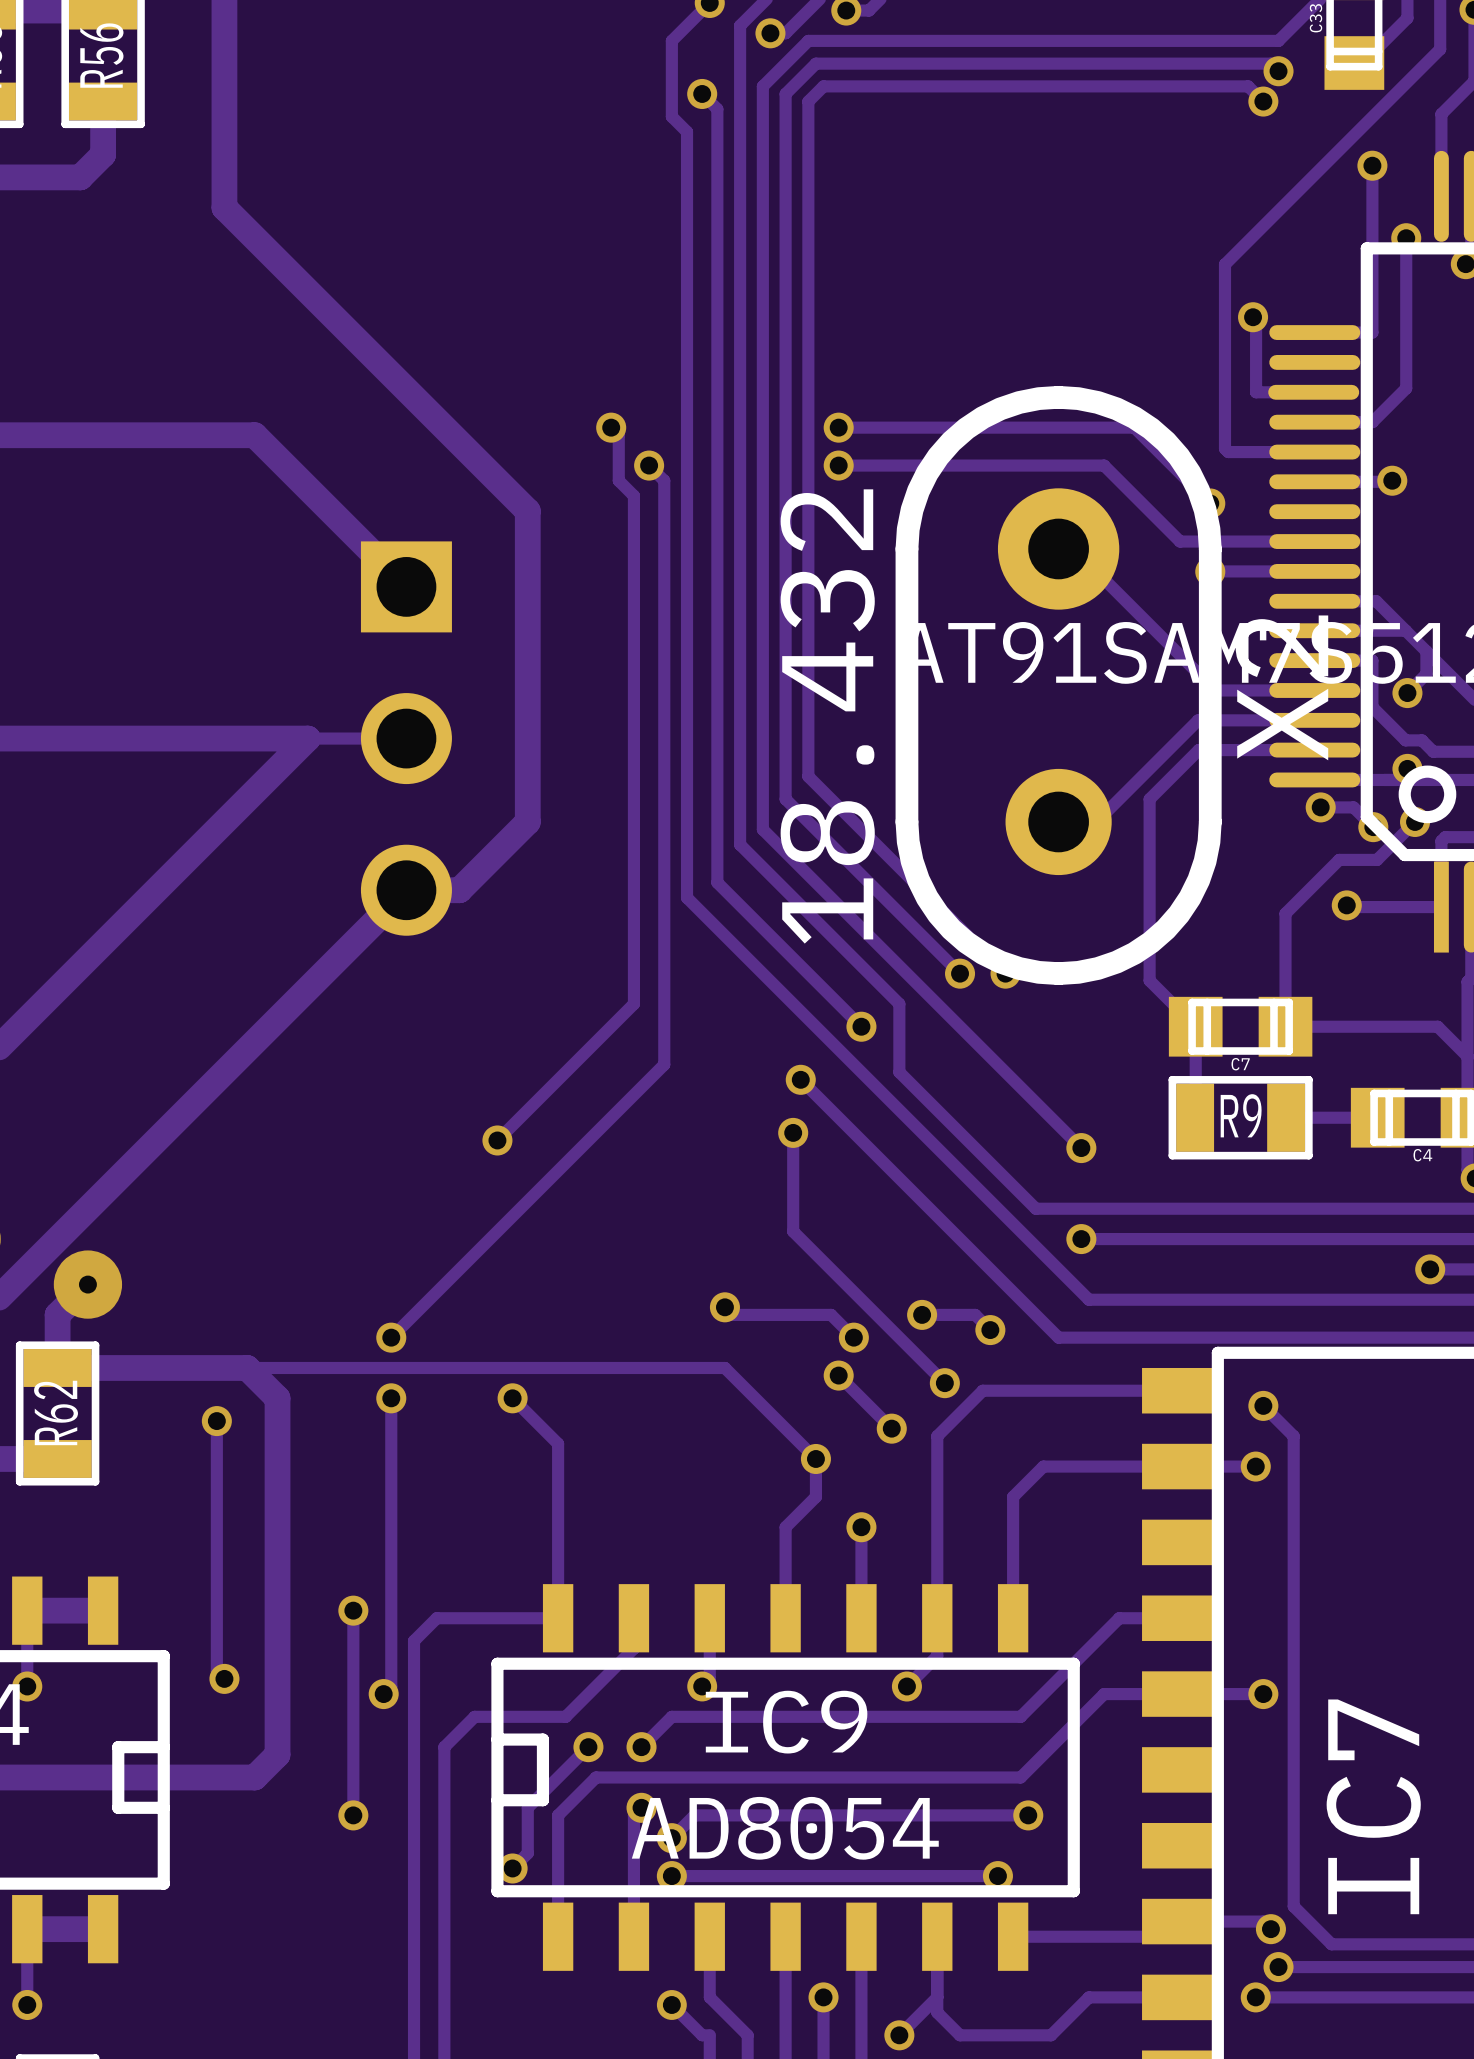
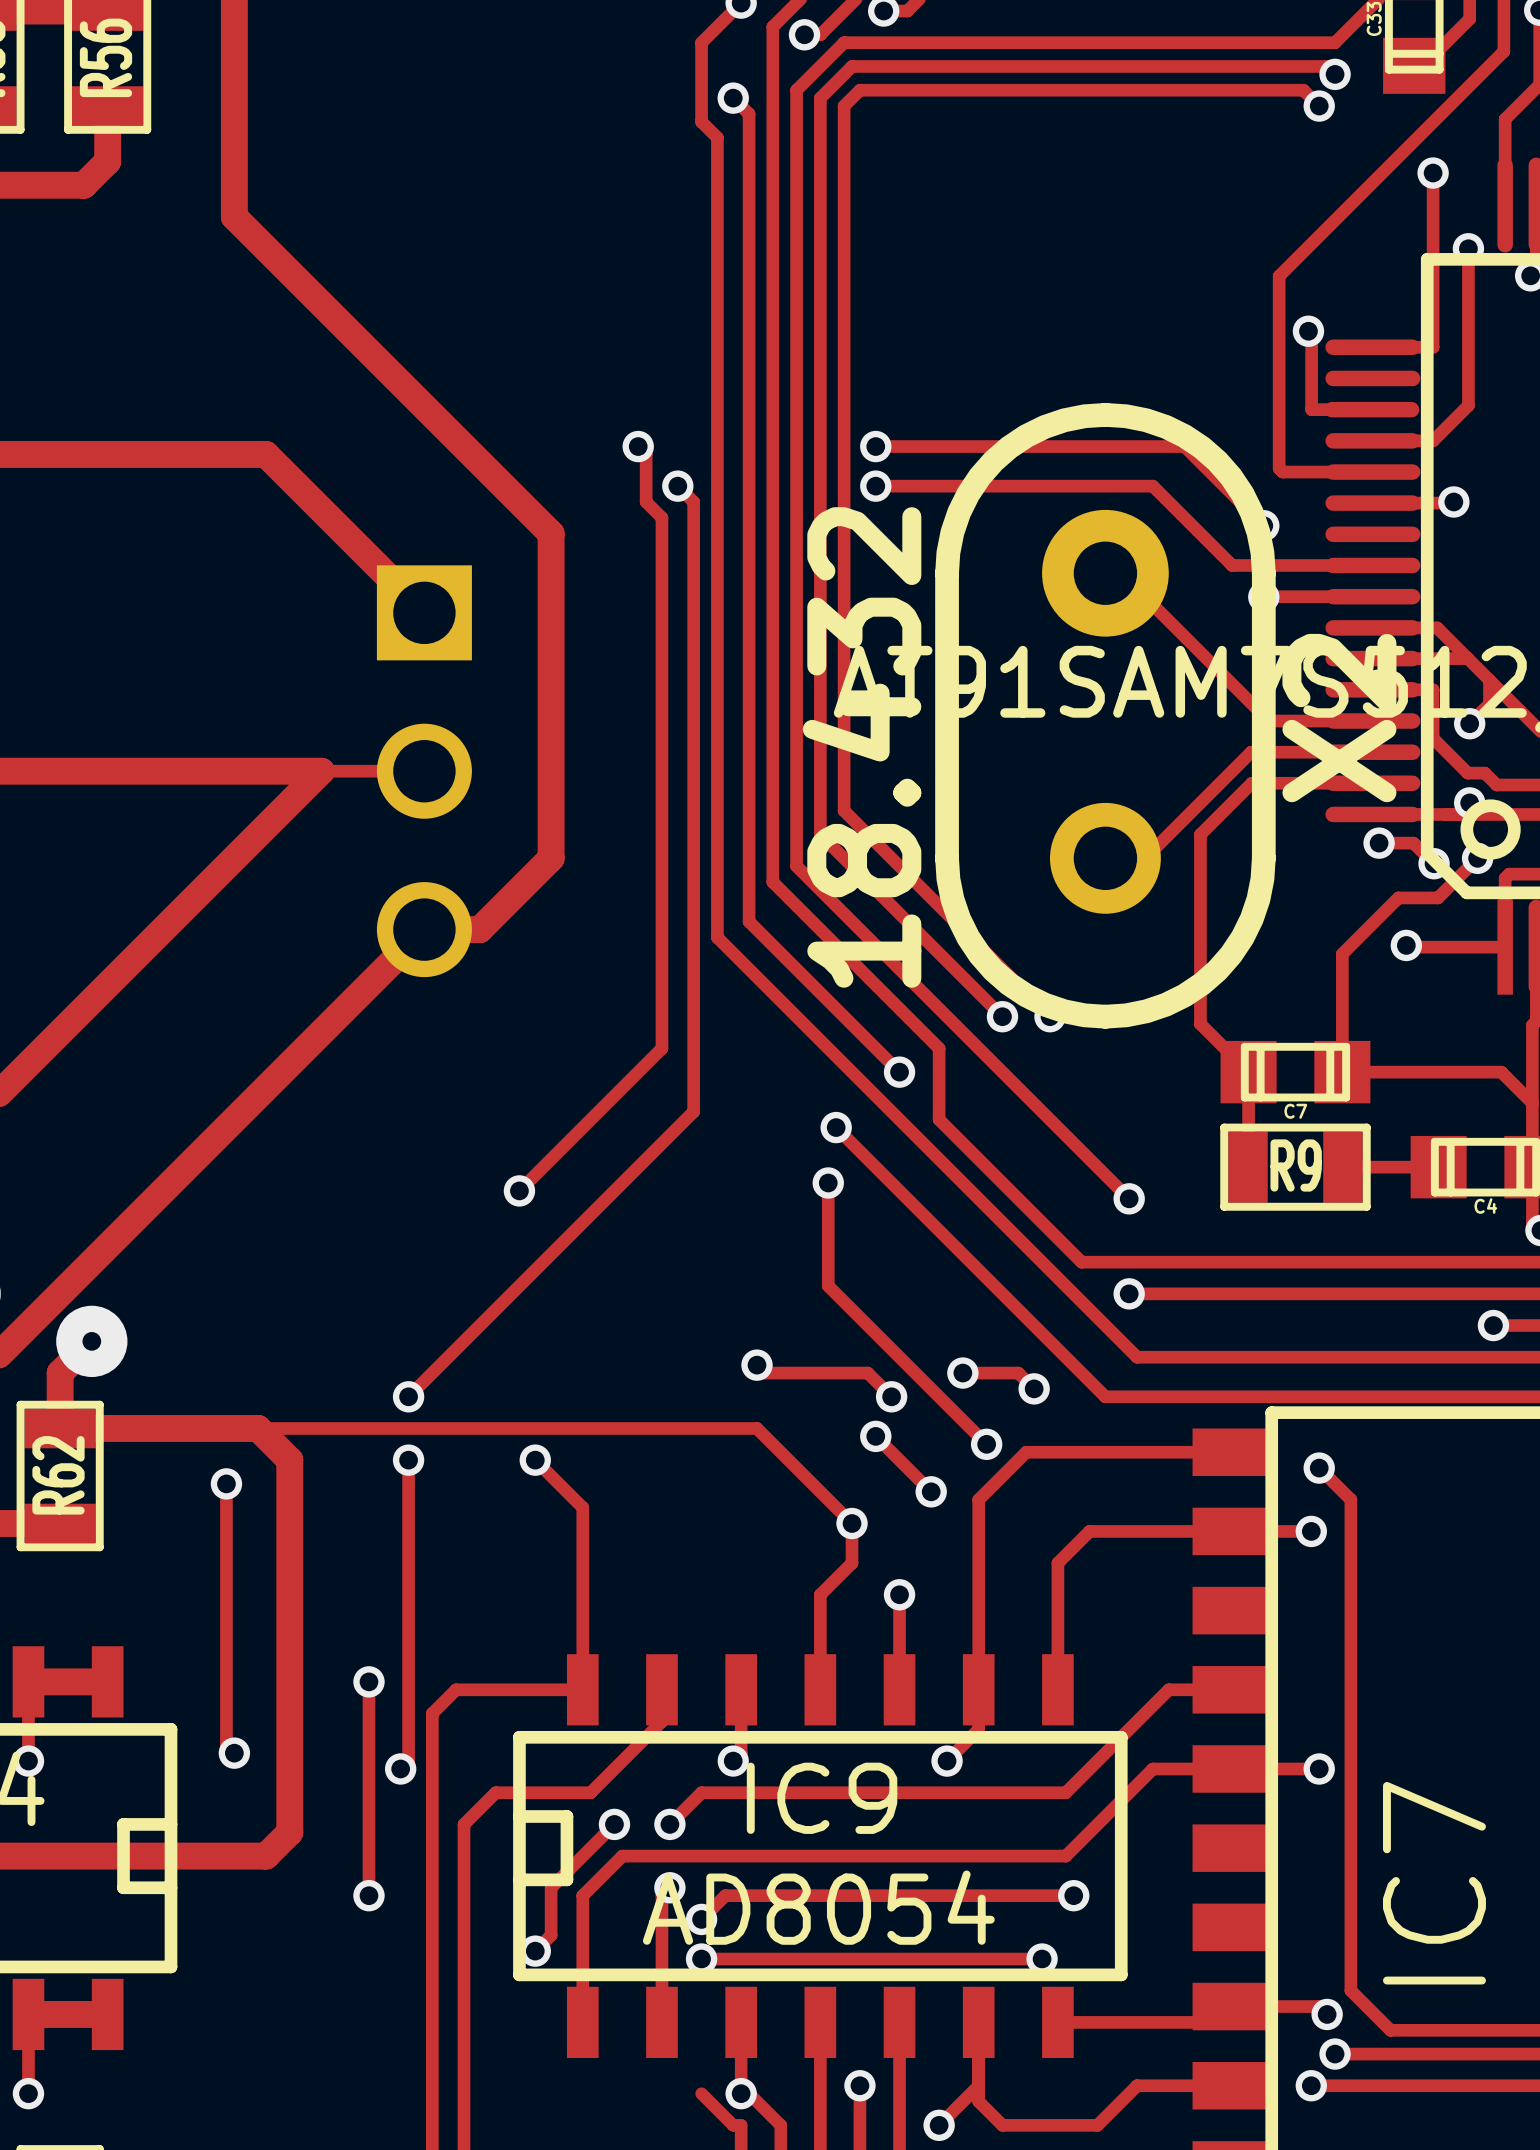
via position: (671, 2004) -> (741, 2093)

